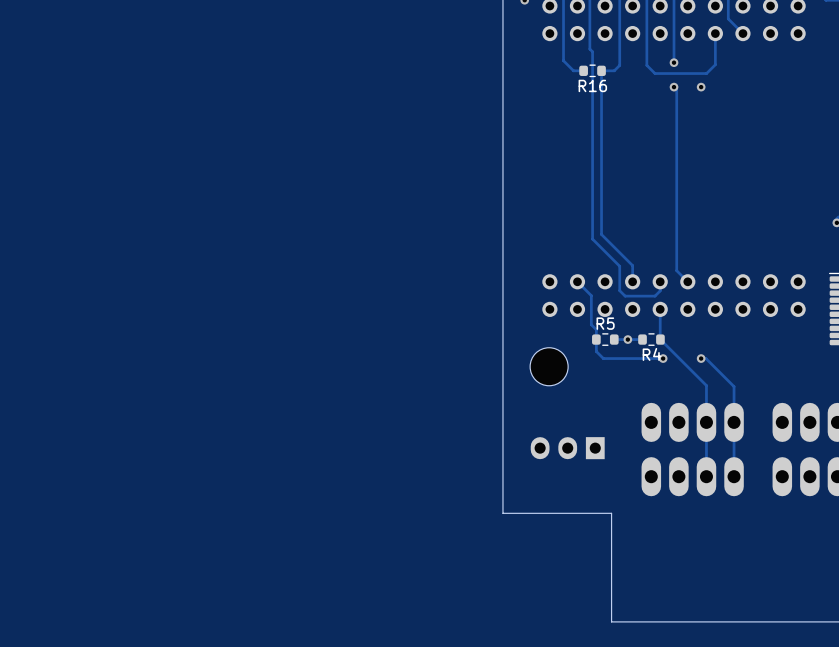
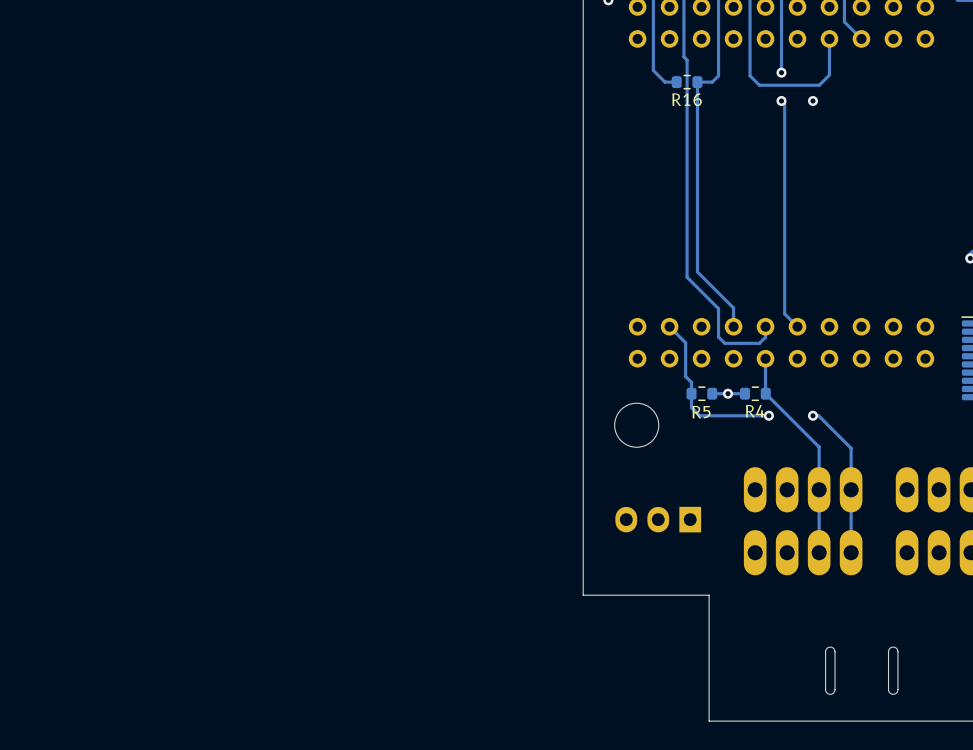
R5 name position: R5 (605, 323) -> R5 (701, 412)
board edge: none -> (835, 651) (834, 690) (829, 694) (825, 690) (825, 651) (830, 647) (835, 651)
board edge: none -> (897, 651) (897, 690) (892, 694) (888, 690) (888, 651) (893, 647) (897, 651)

